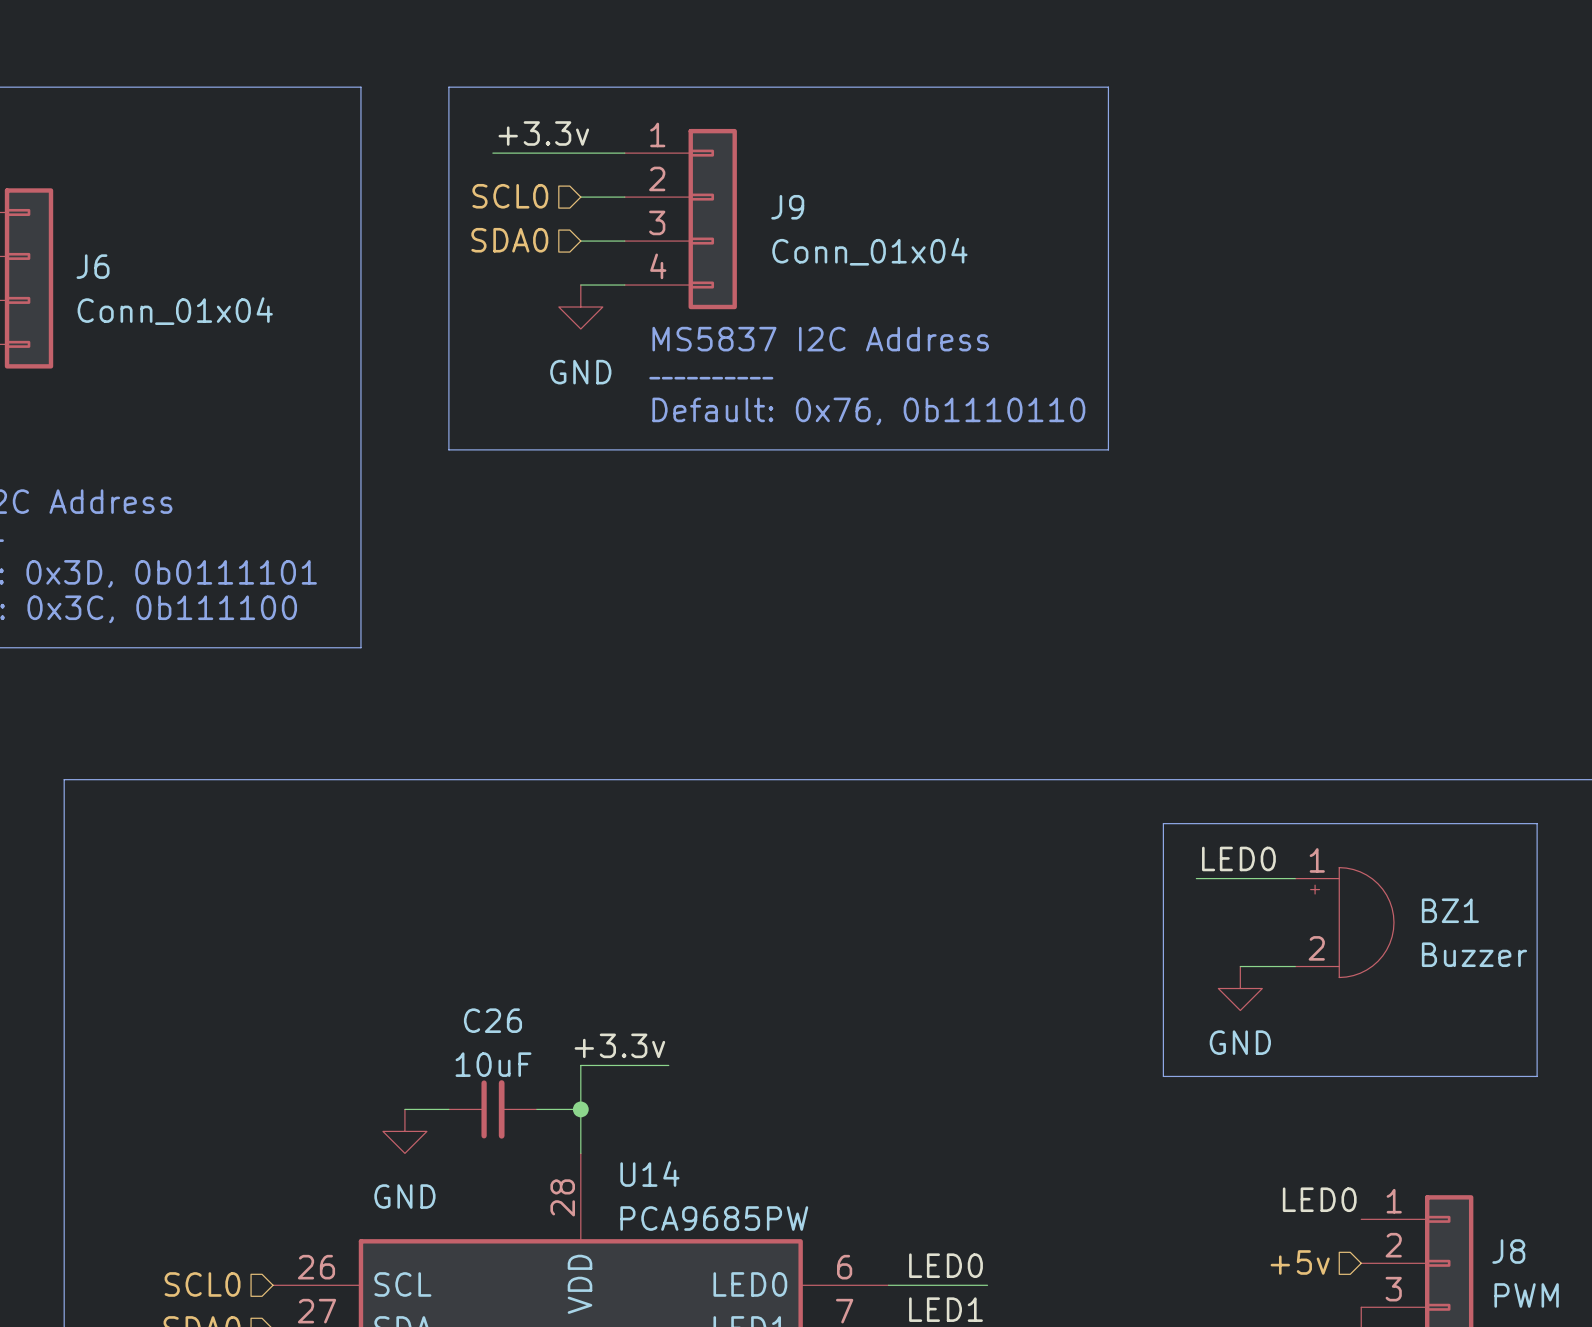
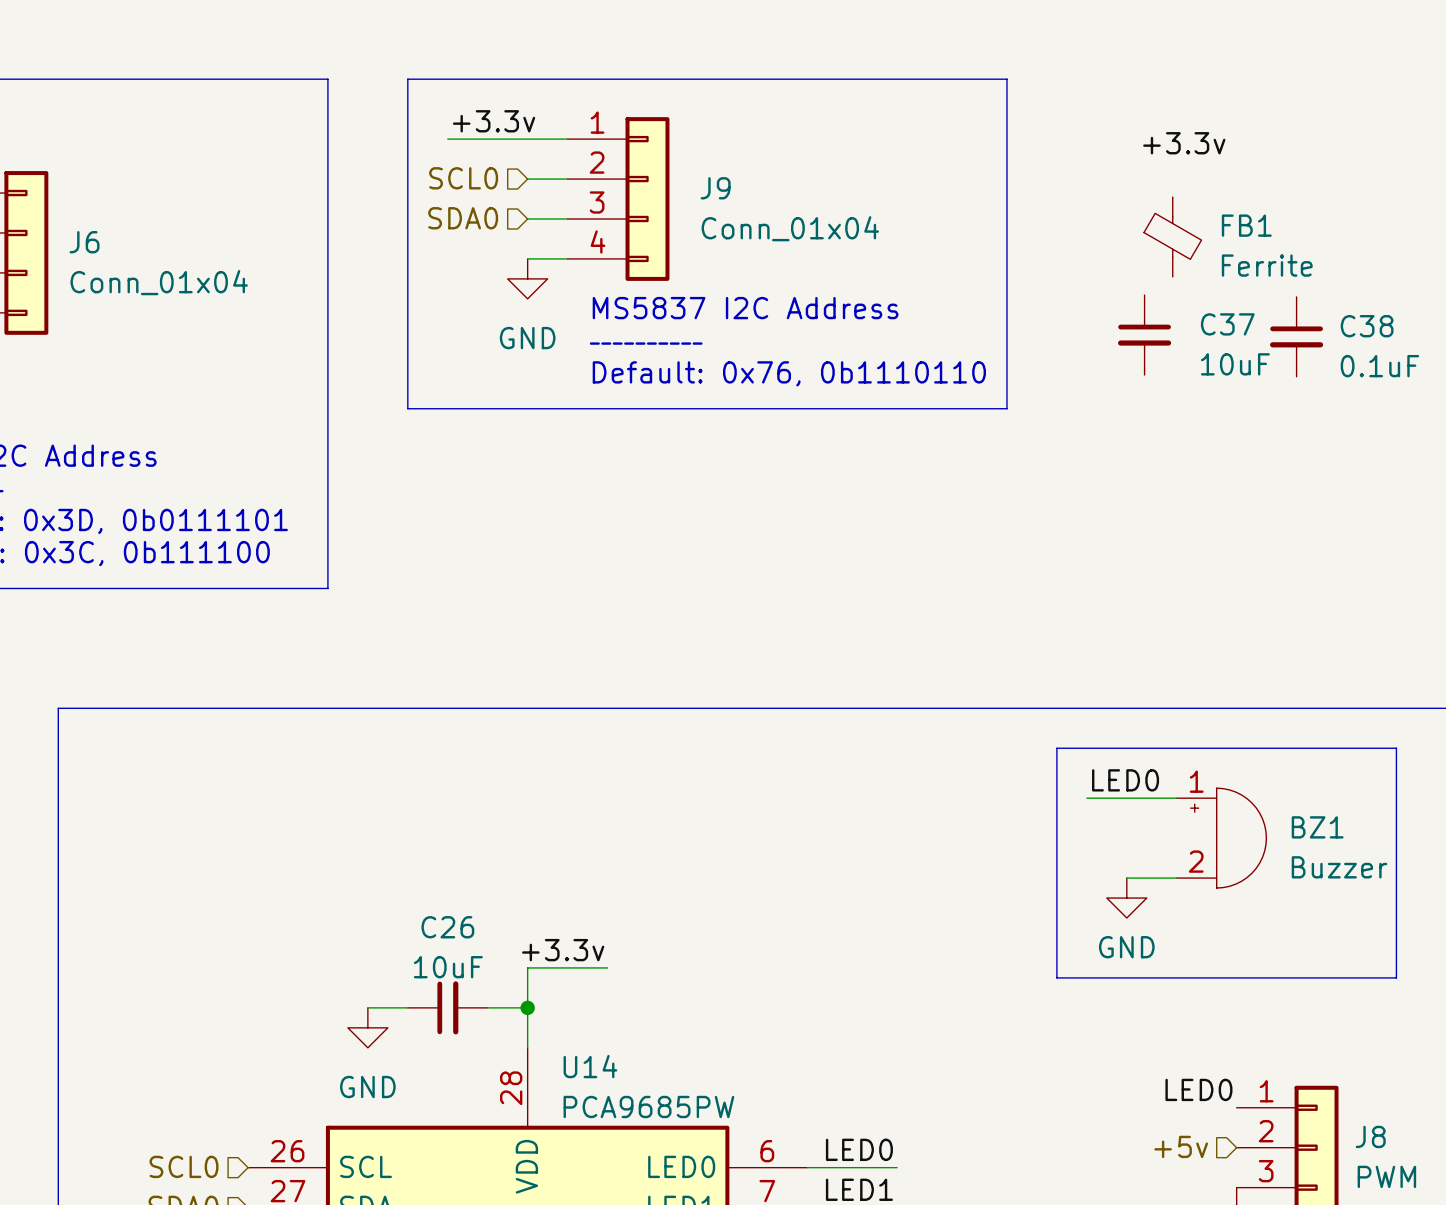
label: none -> +3.3v (1184, 143)
FB1: none -> Ferrite (1172, 236)
C37: none -> 10uF (1144, 335)
C38: none -> 0.1uF (1296, 336)

